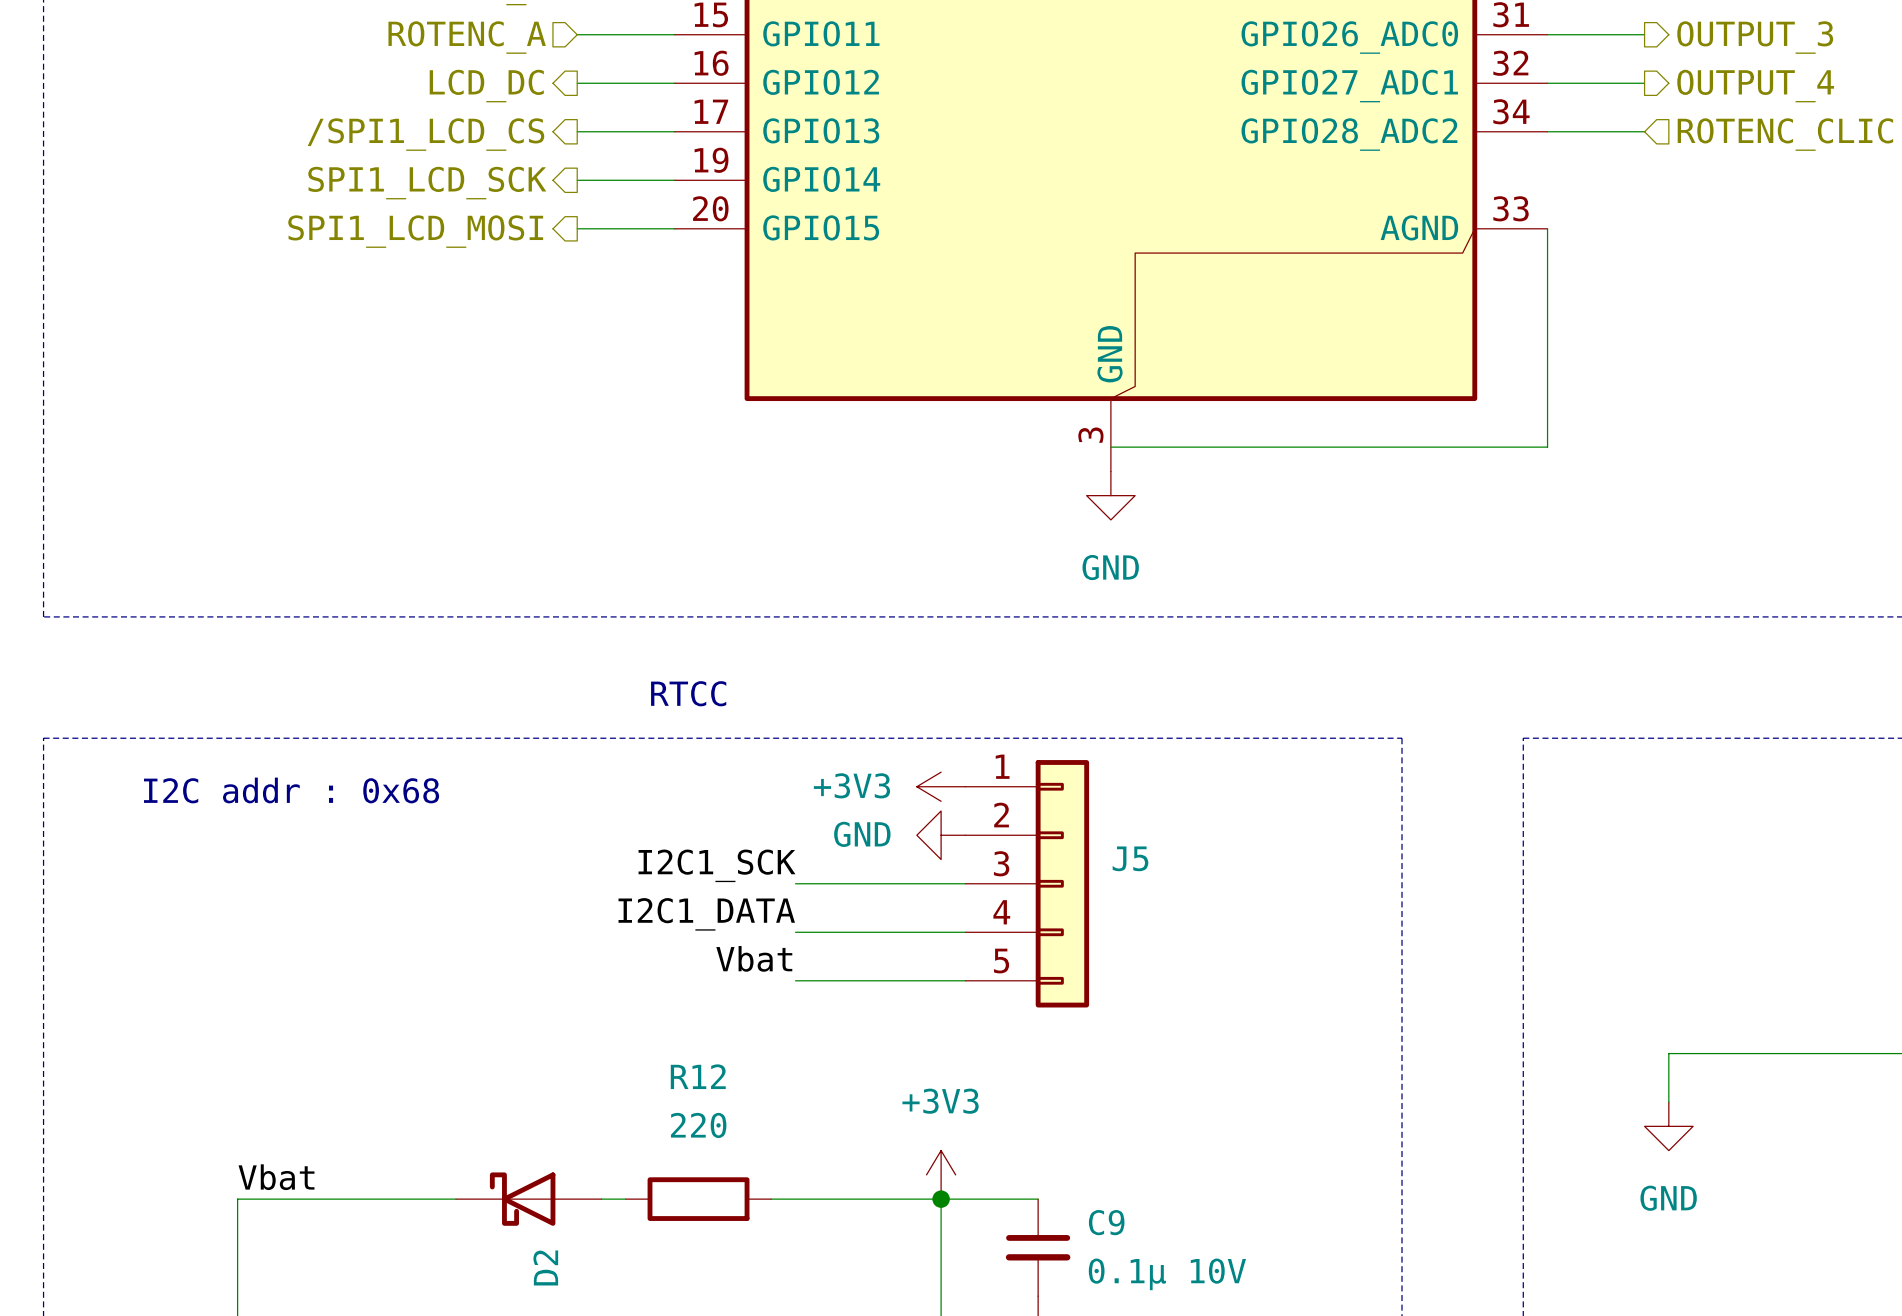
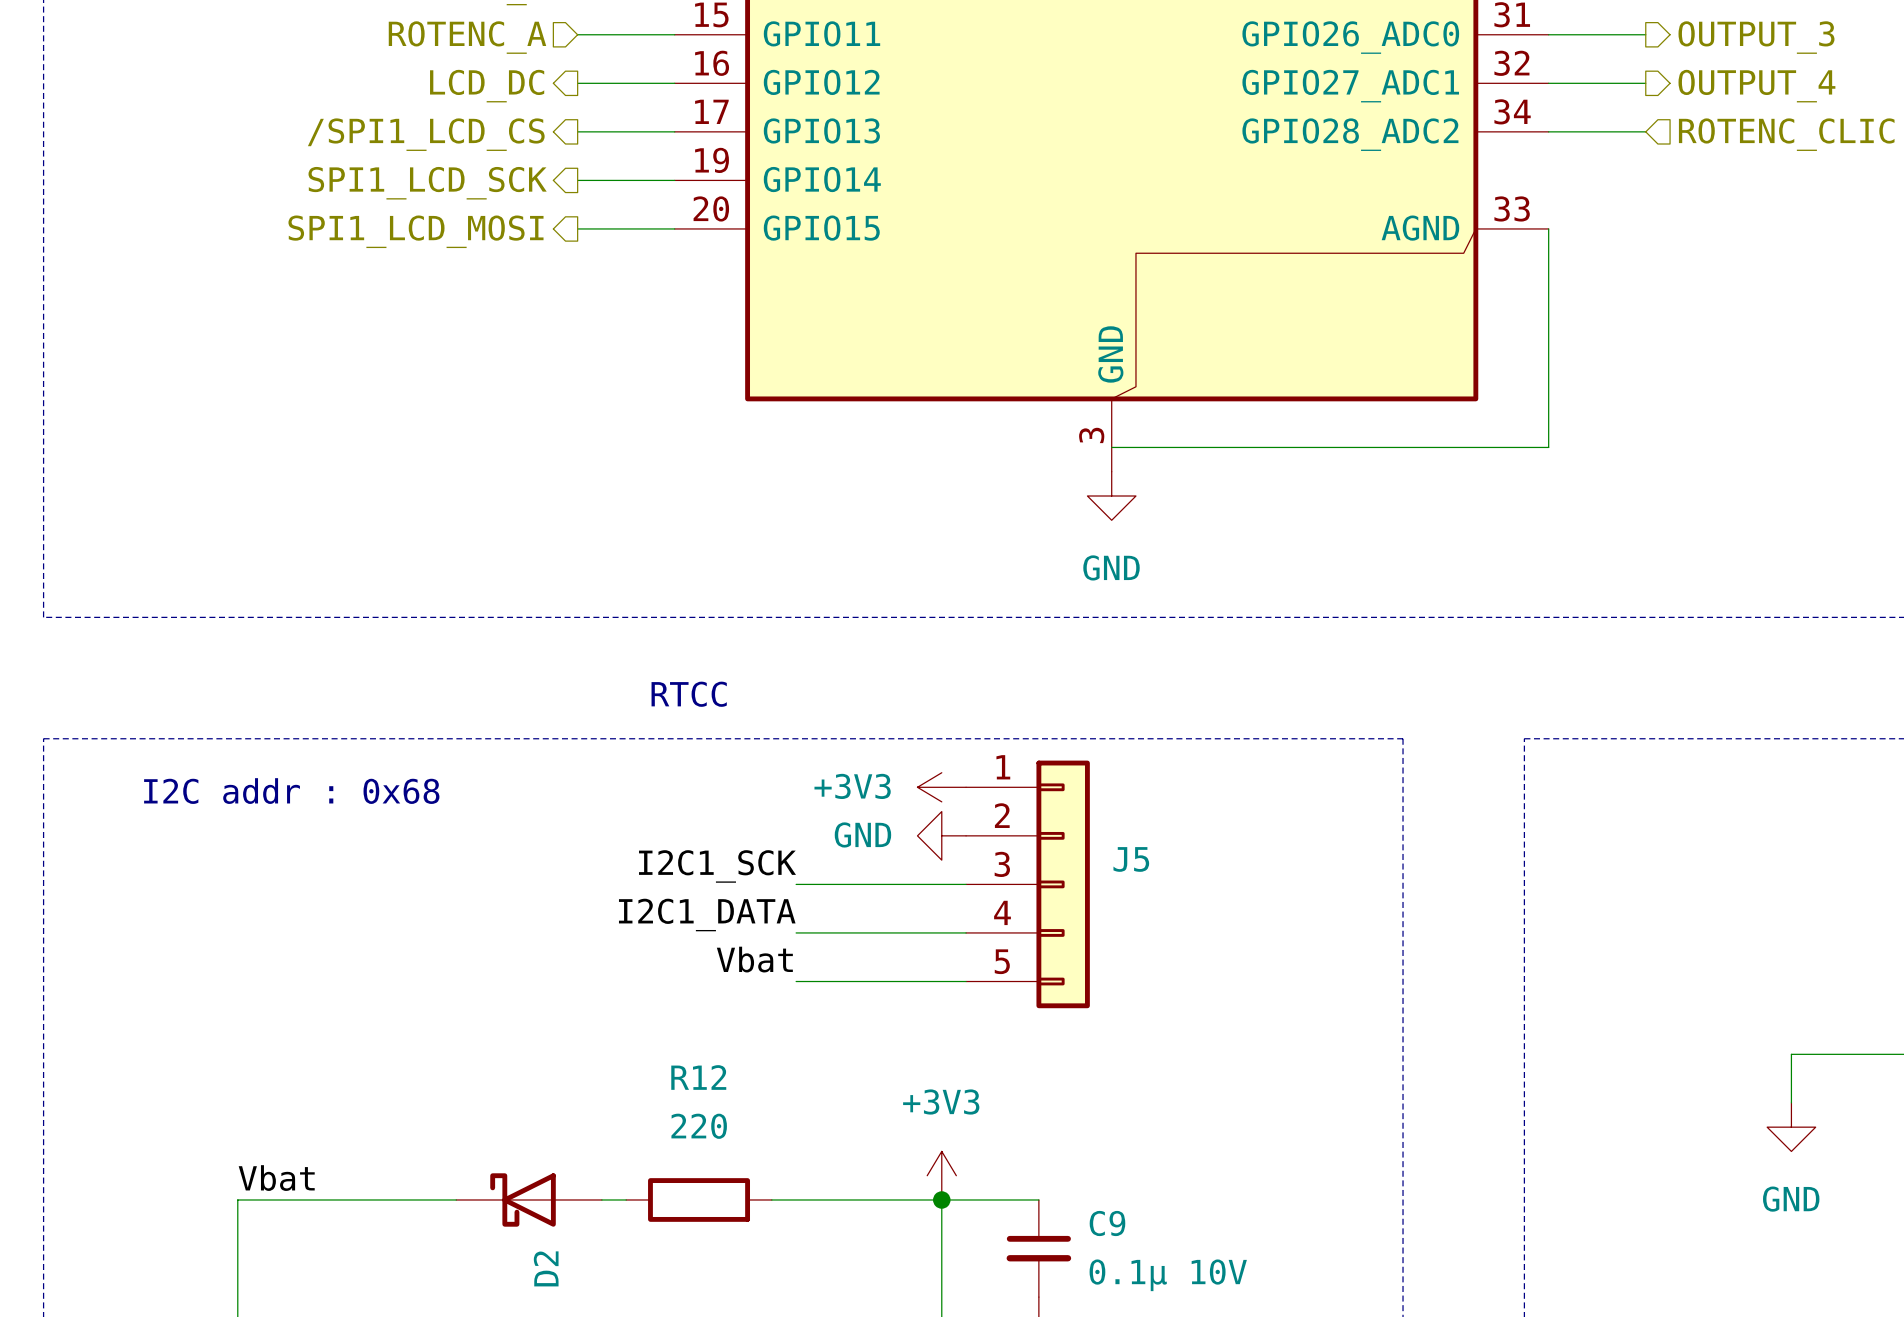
wire: (1790, 1053) (1668, 1053) (1668, 1102) -> (1791, 1054) (1791, 1102)
power symbol position: GND (1668, 1126) -> GND (1791, 1127)

